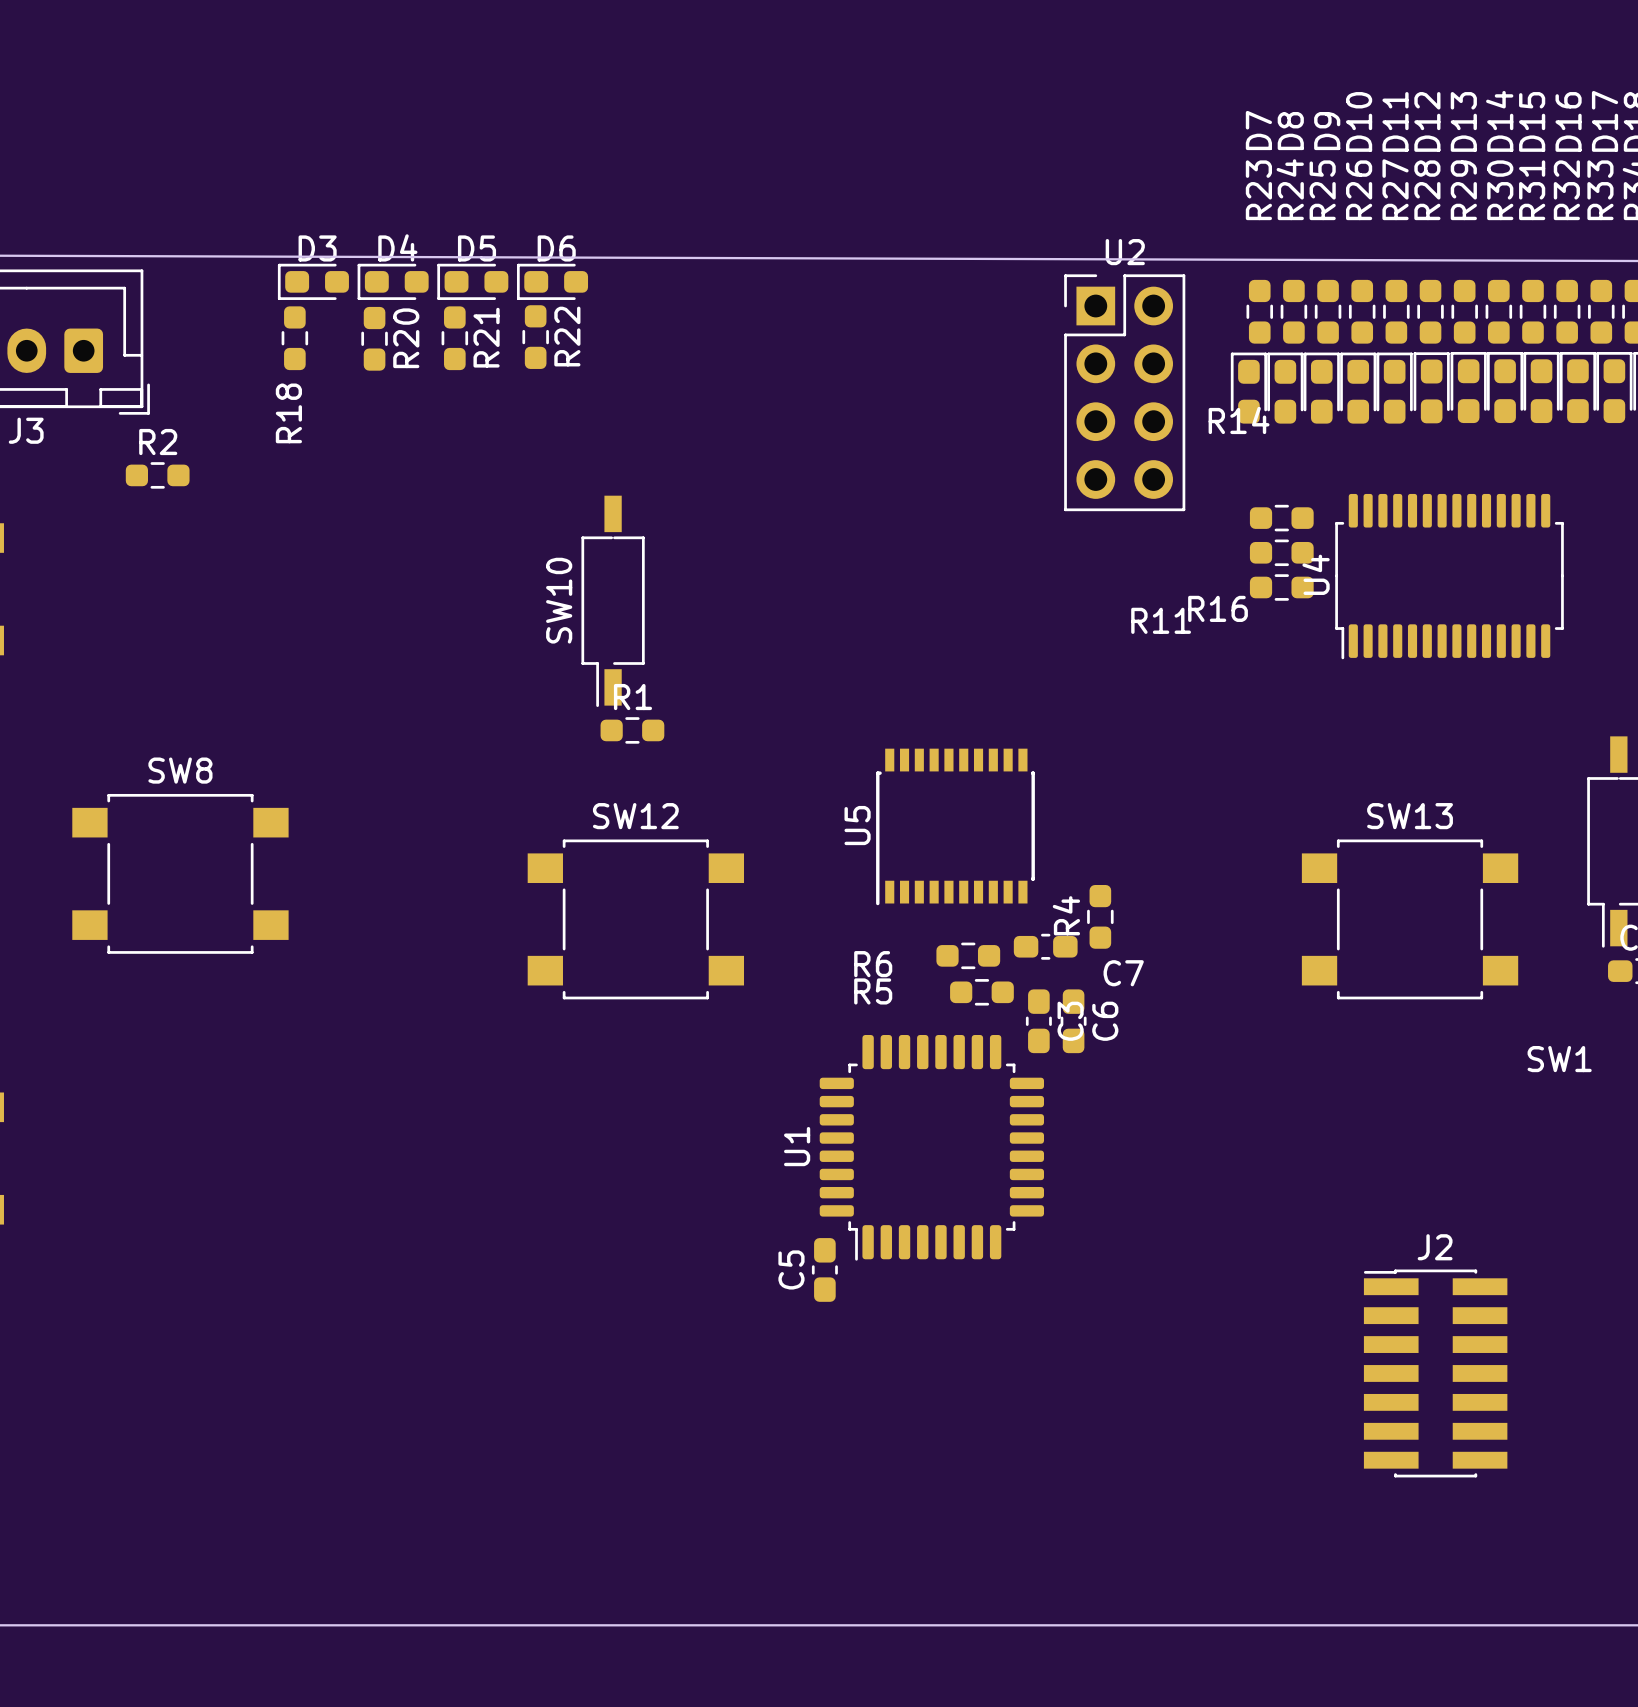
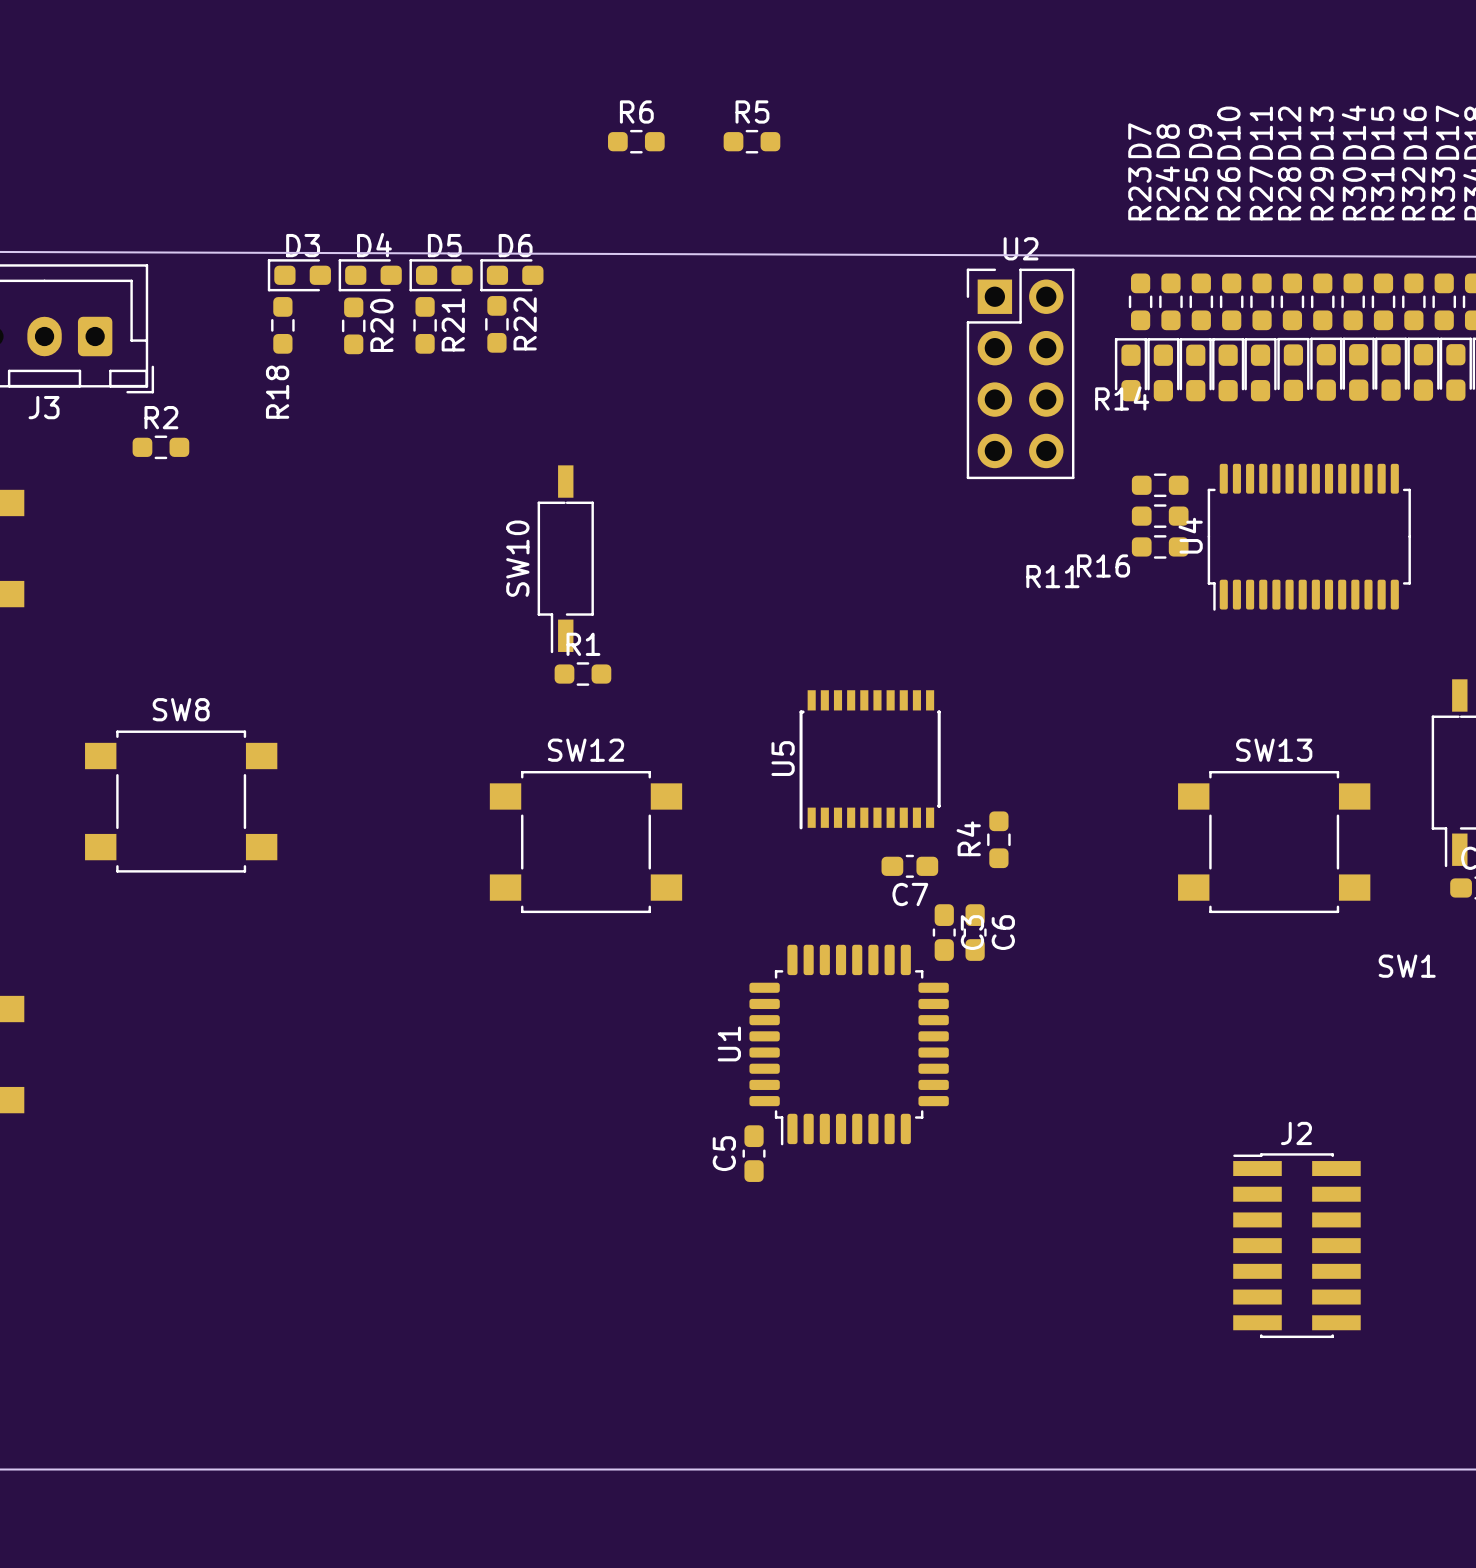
C7 position: (1045, 946) -> (909, 866)
R6 position: (968, 955) -> (636, 141)
R6 name position: R6 (873, 964) -> R6 (636, 111)
C7 name position: C7 (1123, 973) -> C7 (910, 894)
R5 name position: R5 (873, 991) -> R5 (752, 111)
R5 position: (981, 992) -> (751, 141)

